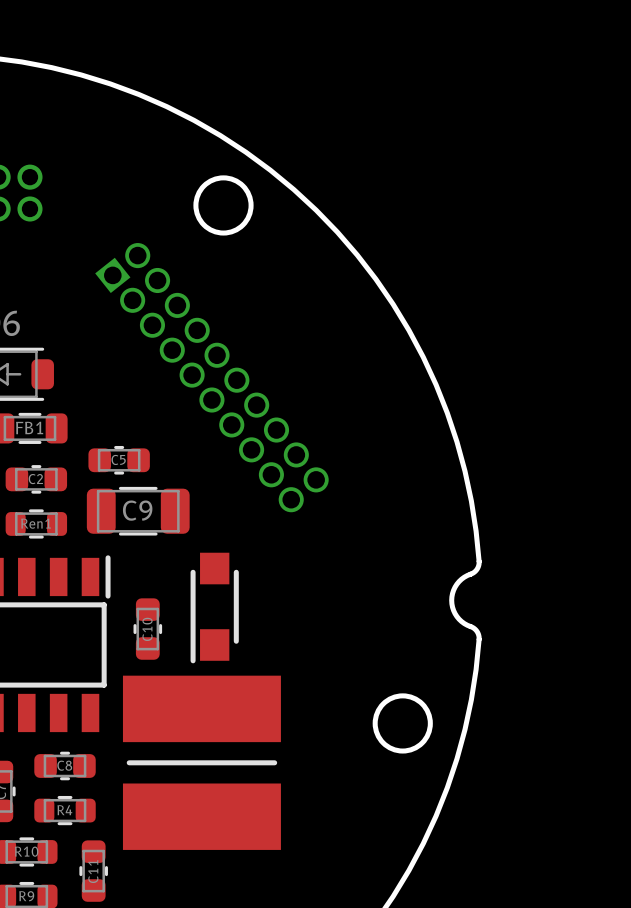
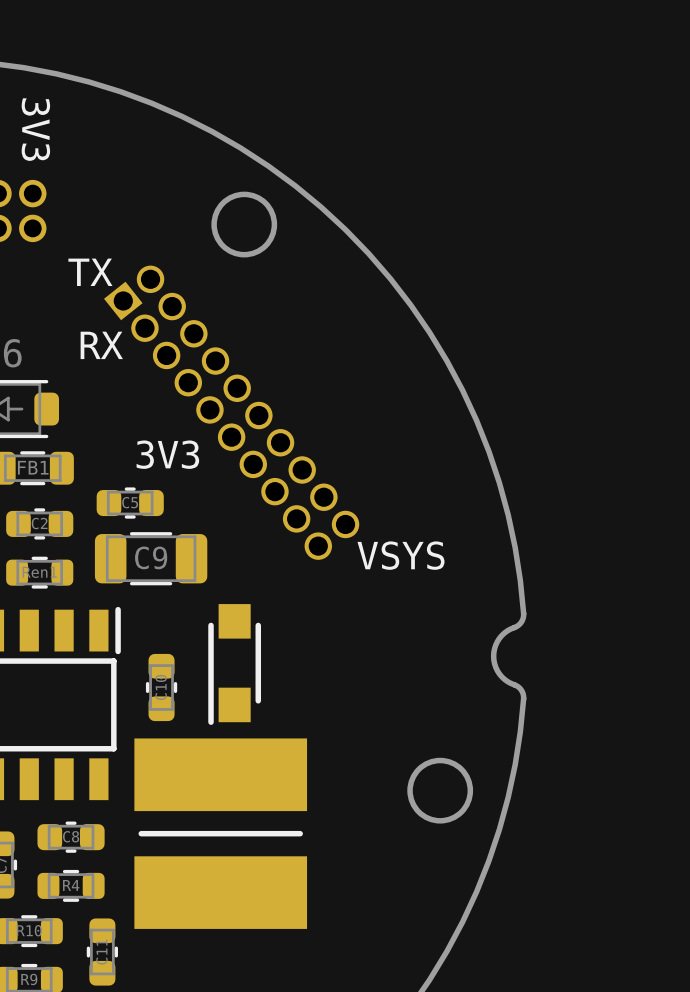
text: none -> 3V3 (35, 129)
text: none -> TX (90, 272)
text: none -> RX (101, 345)
text: none -> 3V3 (167, 454)
text: none -> VSYS (401, 555)

